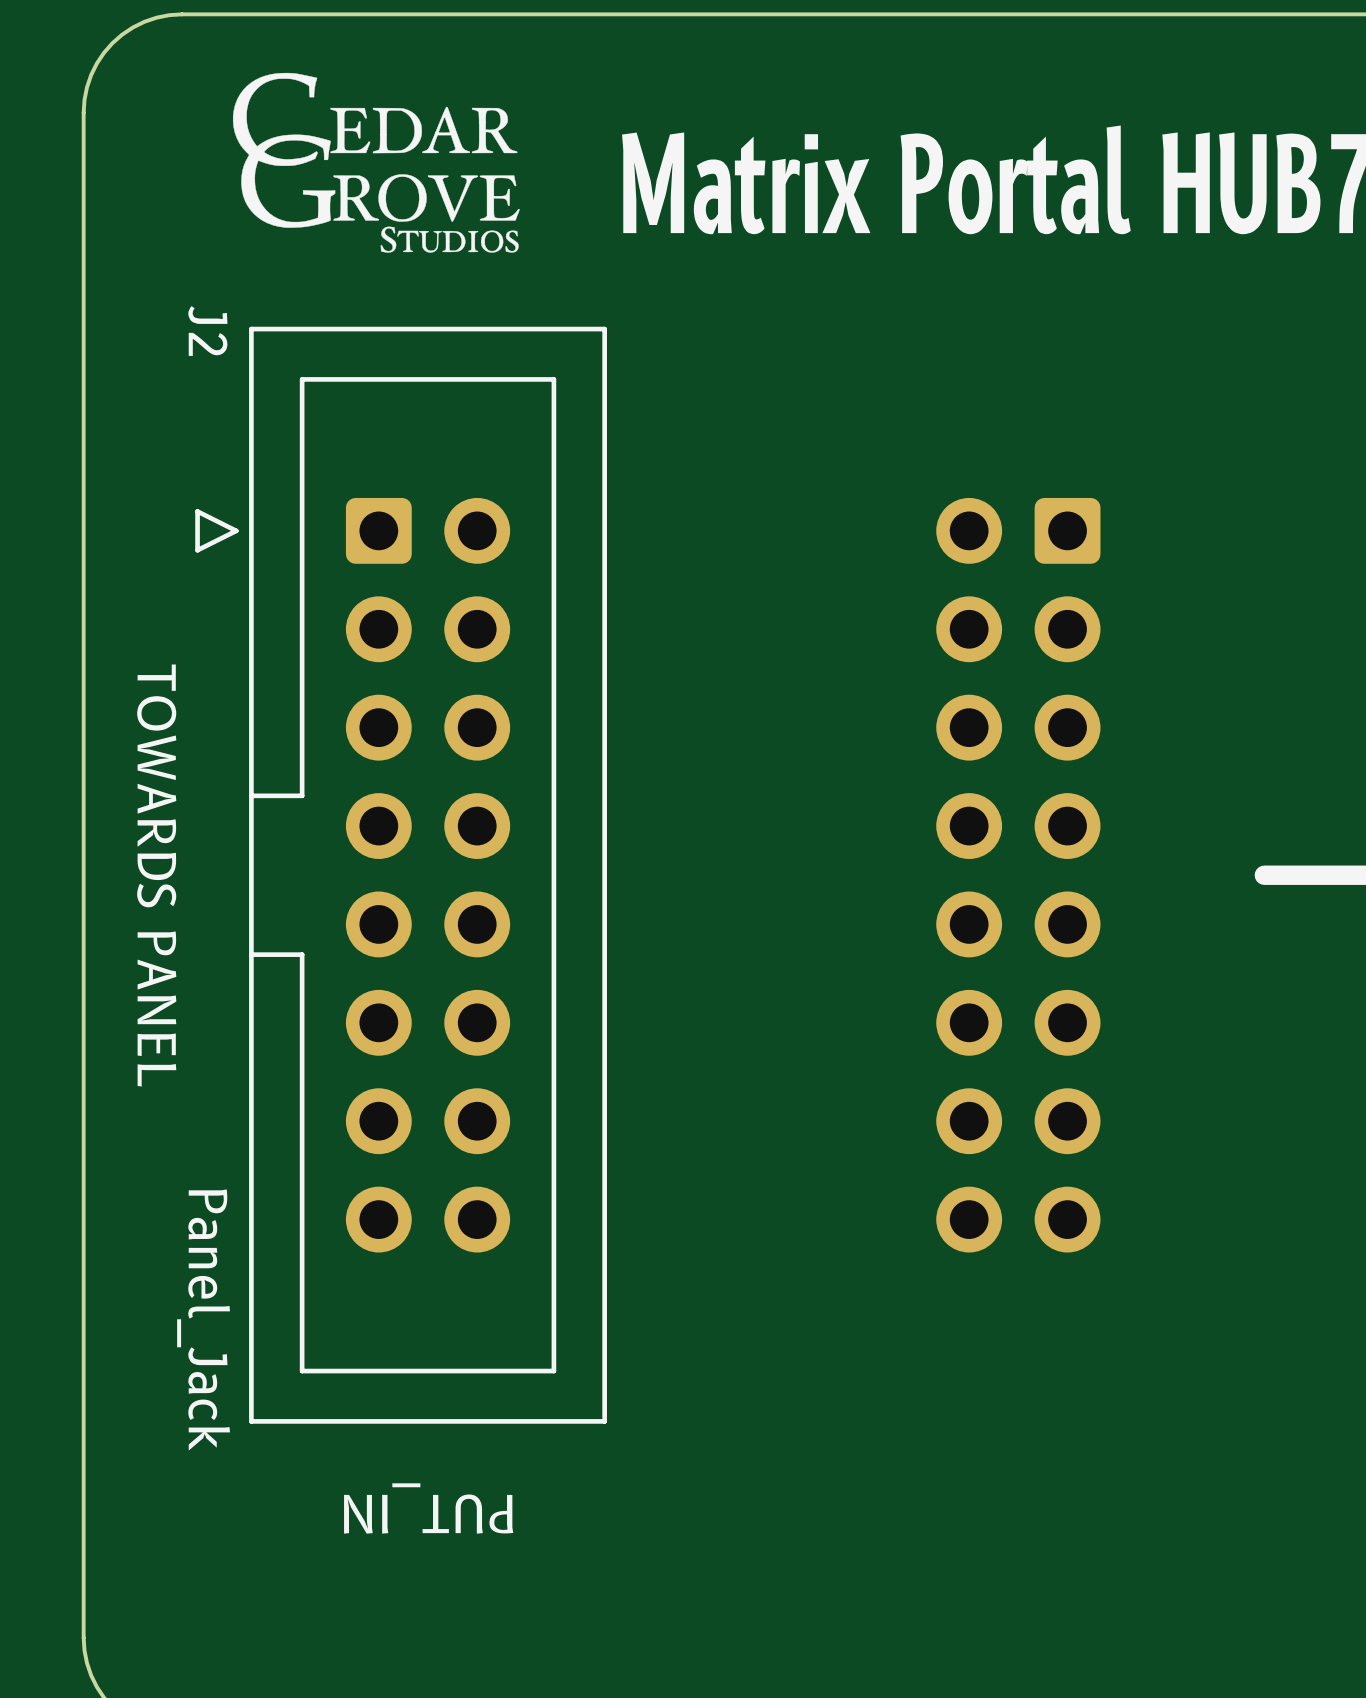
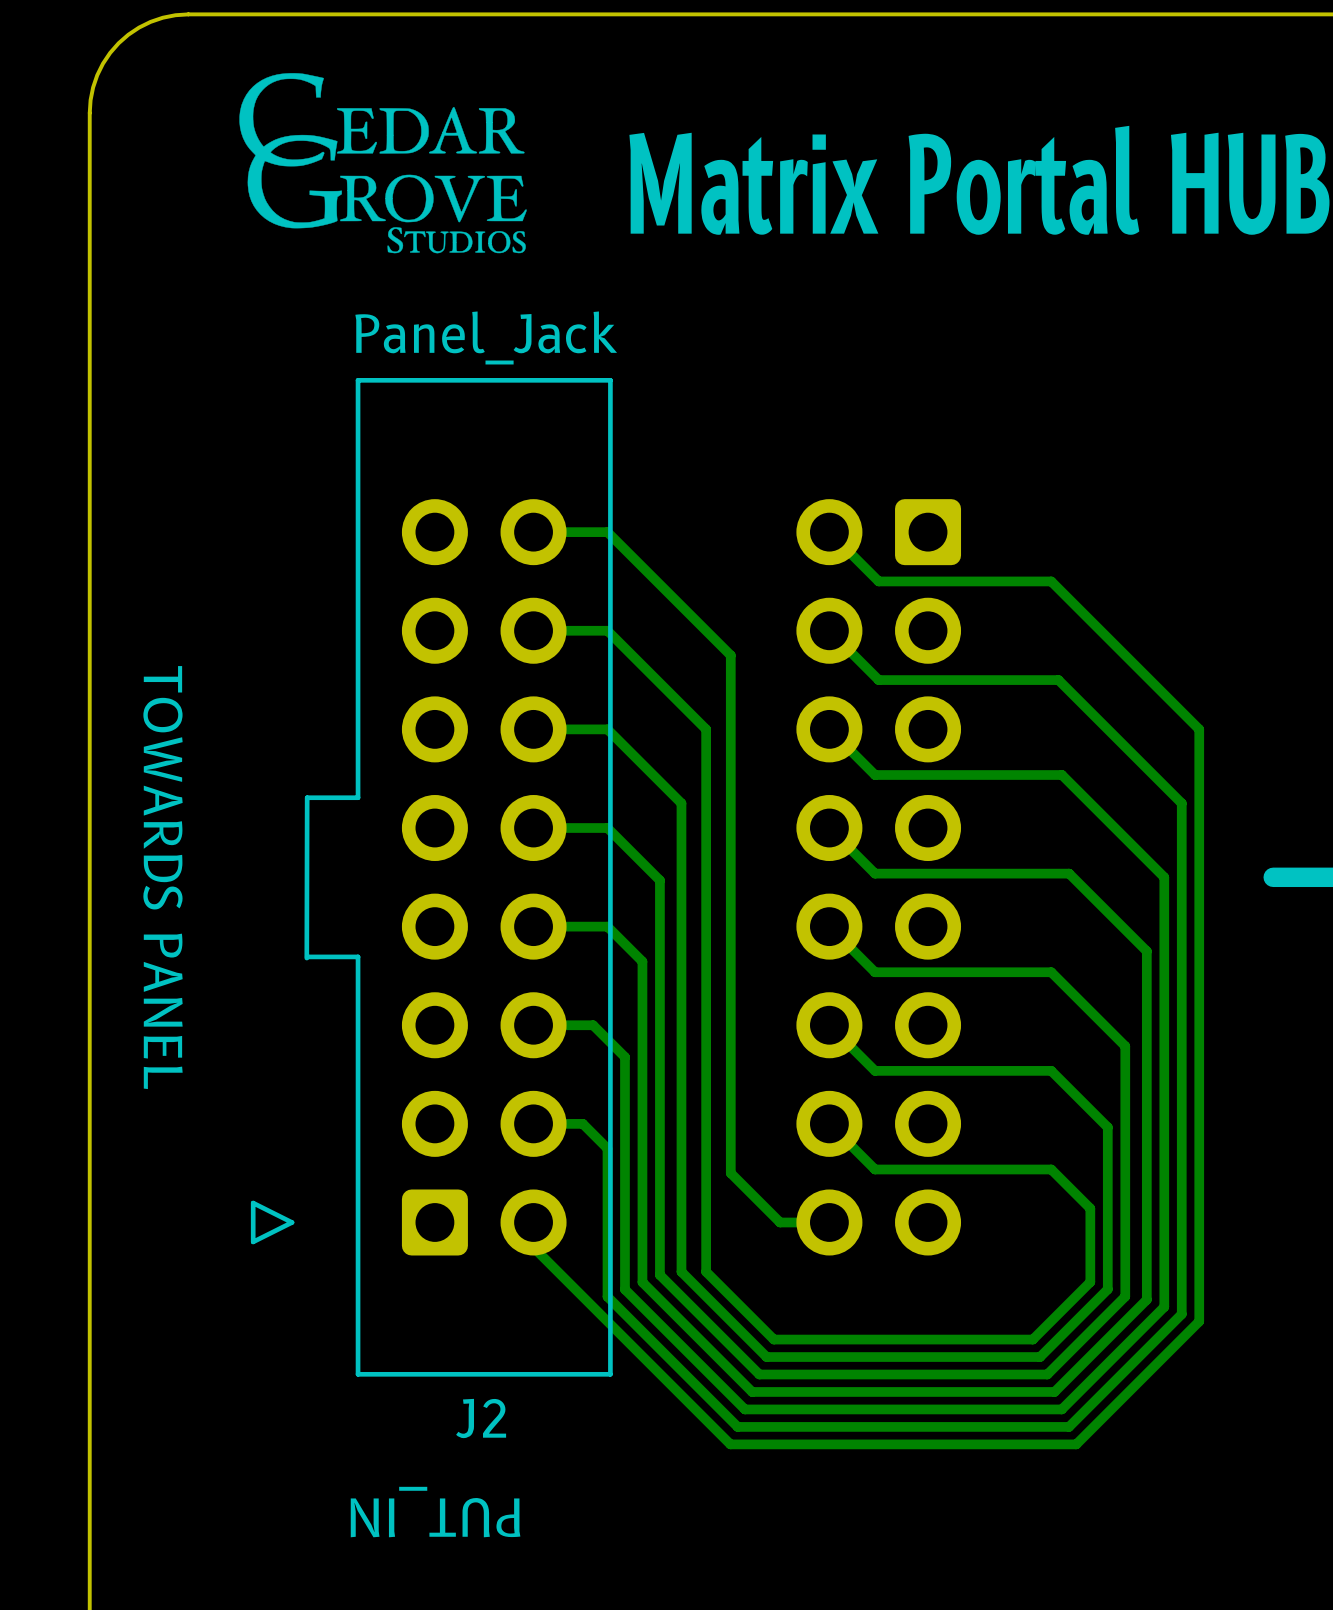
track: none -> (533, 532) (607, 532) (730, 655) (730, 1173) (780, 1222) (829, 1222)
track: none -> (829, 532) (878, 581) (1051, 581) (1199, 729) (1199, 1321) (1076, 1444) (730, 1444) (533, 1247) (533, 1222)
track: none -> (533, 630) (607, 630) (706, 729) (706, 1271) (773, 1339) (1032, 1339) (1090, 1282) (1090, 1208) (1051, 1169) (875, 1169) (829, 1123)
track: none -> (829, 630) (878, 680) (1058, 680) (1181, 803) (1181, 1314) (1069, 1426) (737, 1426) (607, 1296) (607, 1148) (582, 1123) (533, 1123)
track: none -> (533, 729) (607, 729) (681, 803) (681, 1271) (766, 1357) (1040, 1357) (1107, 1289) (1107, 1127) (1051, 1070) (875, 1070) (829, 1025)
track: none -> (829, 729) (875, 775) (1061, 775) (1164, 877) (1164, 1306) (1061, 1409) (744, 1409) (624, 1289) (624, 1057) (593, 1025) (533, 1025)
track: none -> (533, 828) (607, 828) (659, 880) (659, 1275) (759, 1374) (1047, 1374) (1125, 1296) (1125, 1046) (1051, 972) (875, 972) (829, 926)
track: none -> (829, 828) (875, 873) (1069, 873) (1146, 951) (1146, 1299) (1054, 1391) (752, 1391) (642, 1282) (642, 961) (607, 926) (533, 926)
J2 side: bottom (401, 875) -> top (431, 877)
part position: (1018, 875) -> (878, 877)

